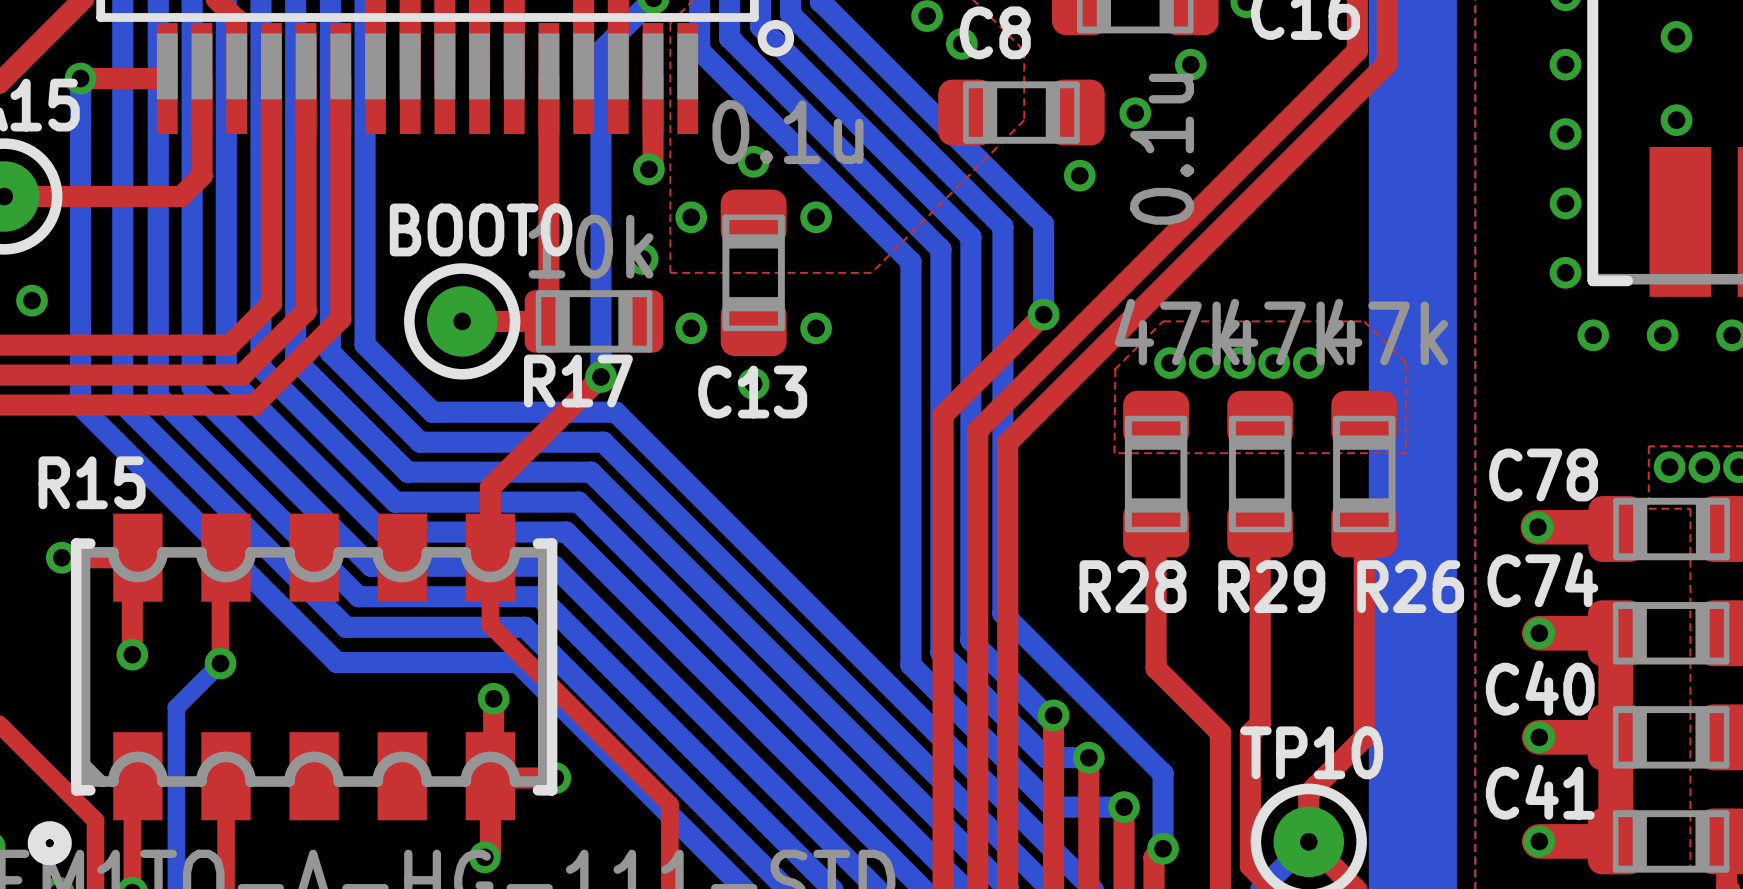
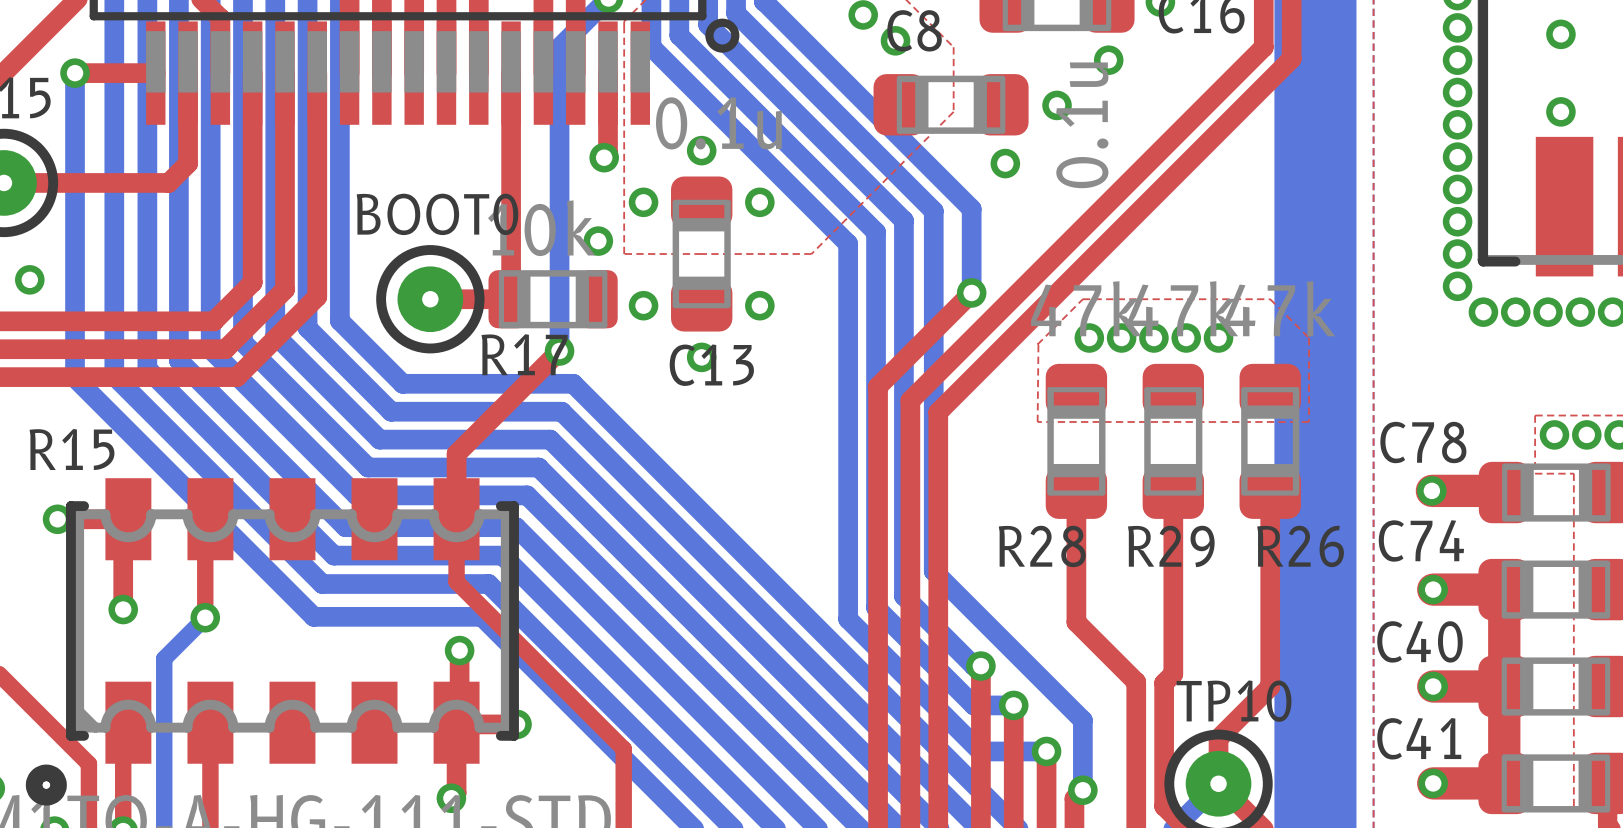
via: none -> (1457, 27)
via: none -> (1457, 92)
via: none -> (1457, 157)
via: none -> (1457, 221)
via: none -> (1457, 286)
via: none -> (1515, 312)
via: none -> (1580, 312)

